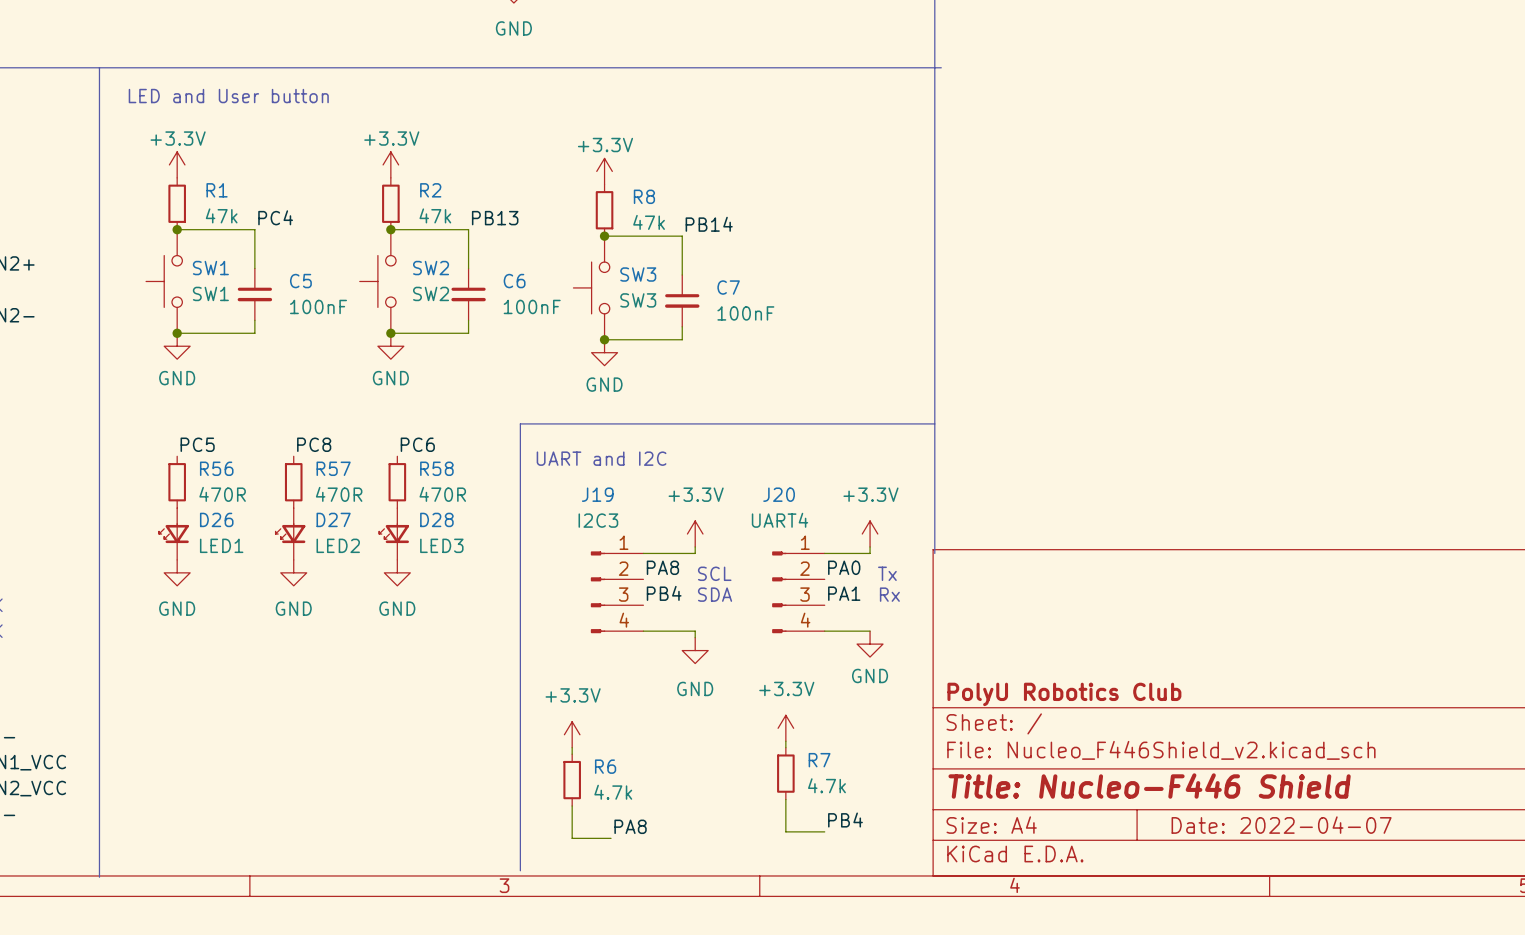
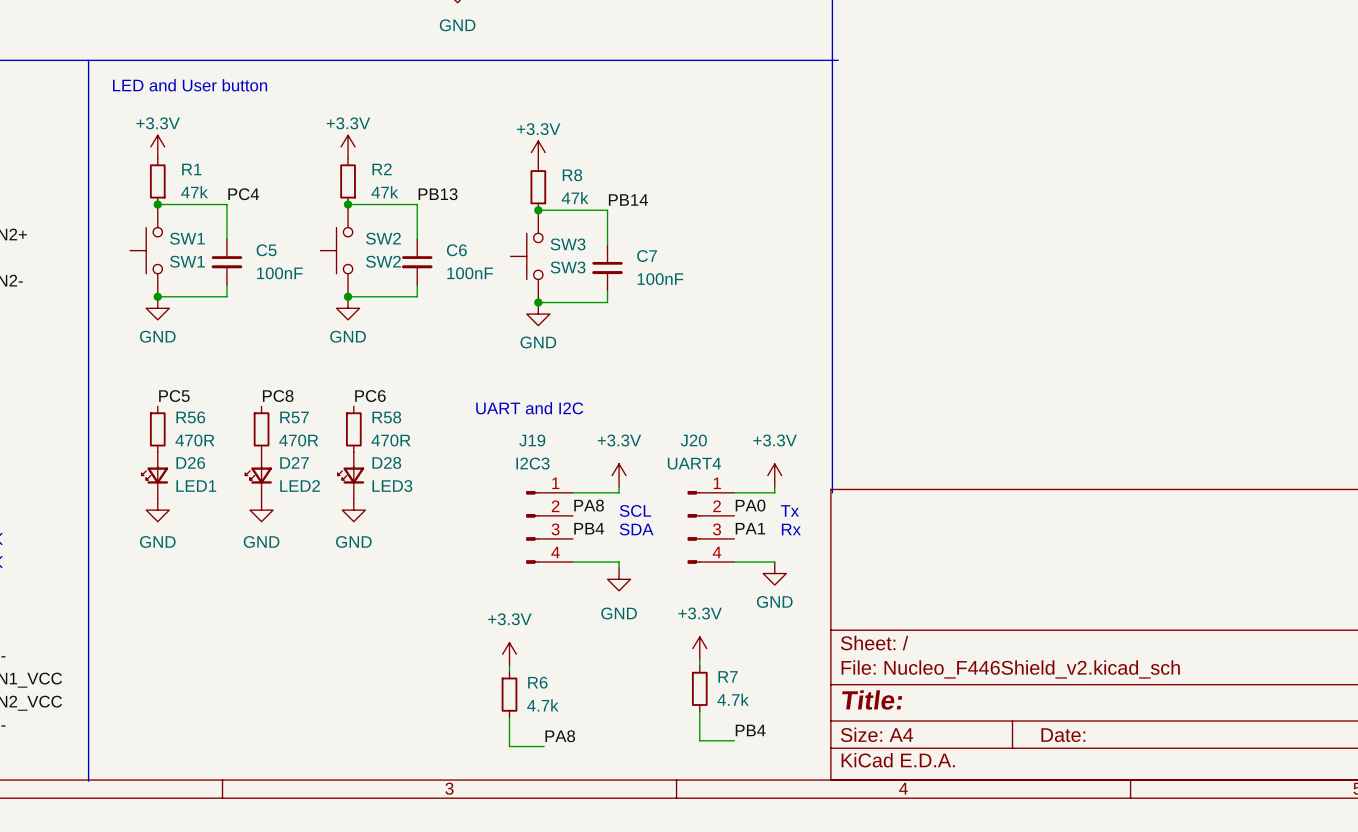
line: (934, 423) (520, 423) (520, 870) -> none
title block: PolyU Robotics Club (1064, 694) -> none
title block: Title: Nucleo-F446 Shield (1149, 786) -> Title: (872, 700)
title block: Date: 2022-04-07 (1281, 825) -> Date: (1063, 735)

